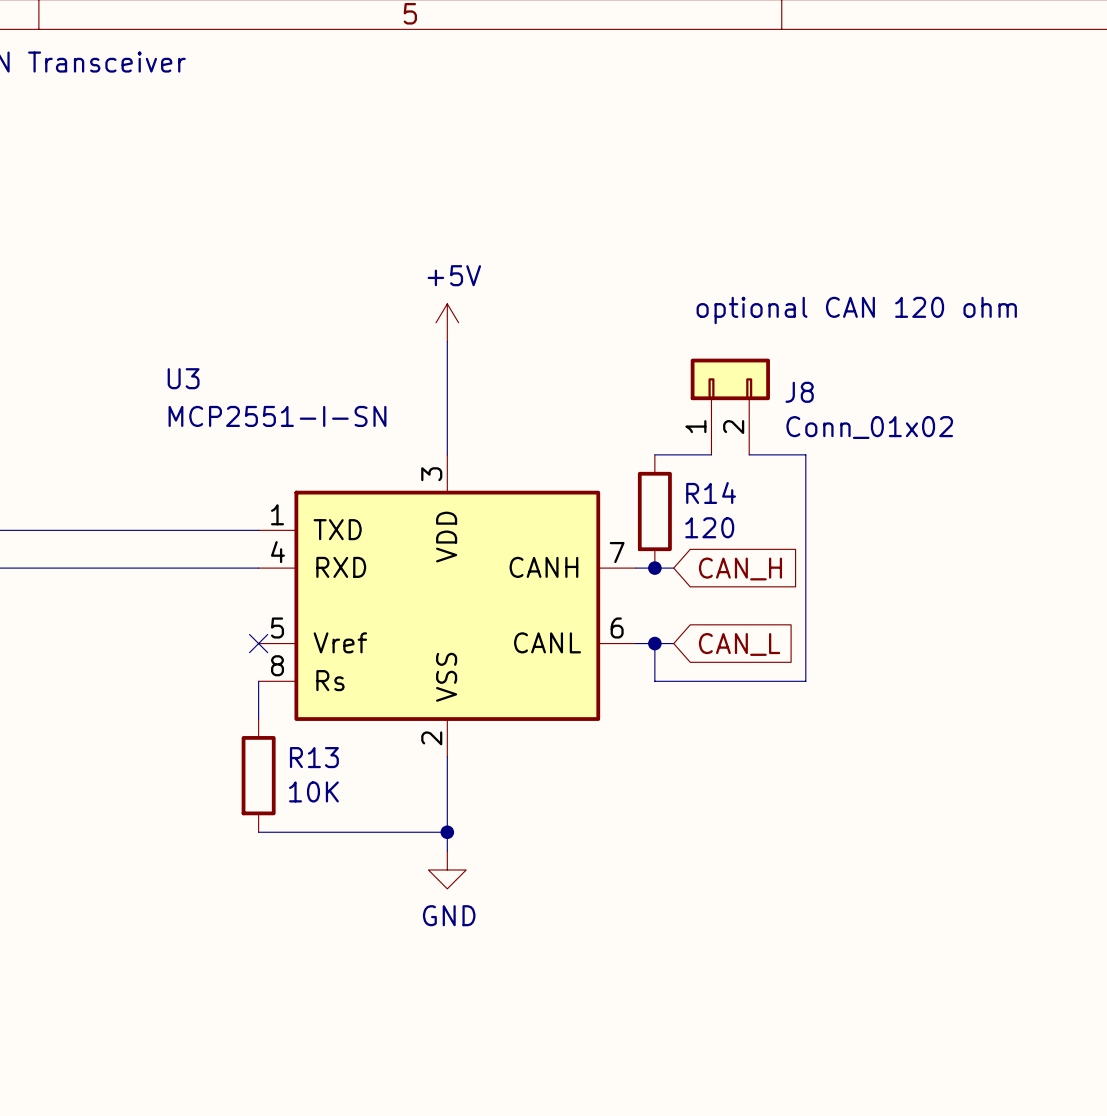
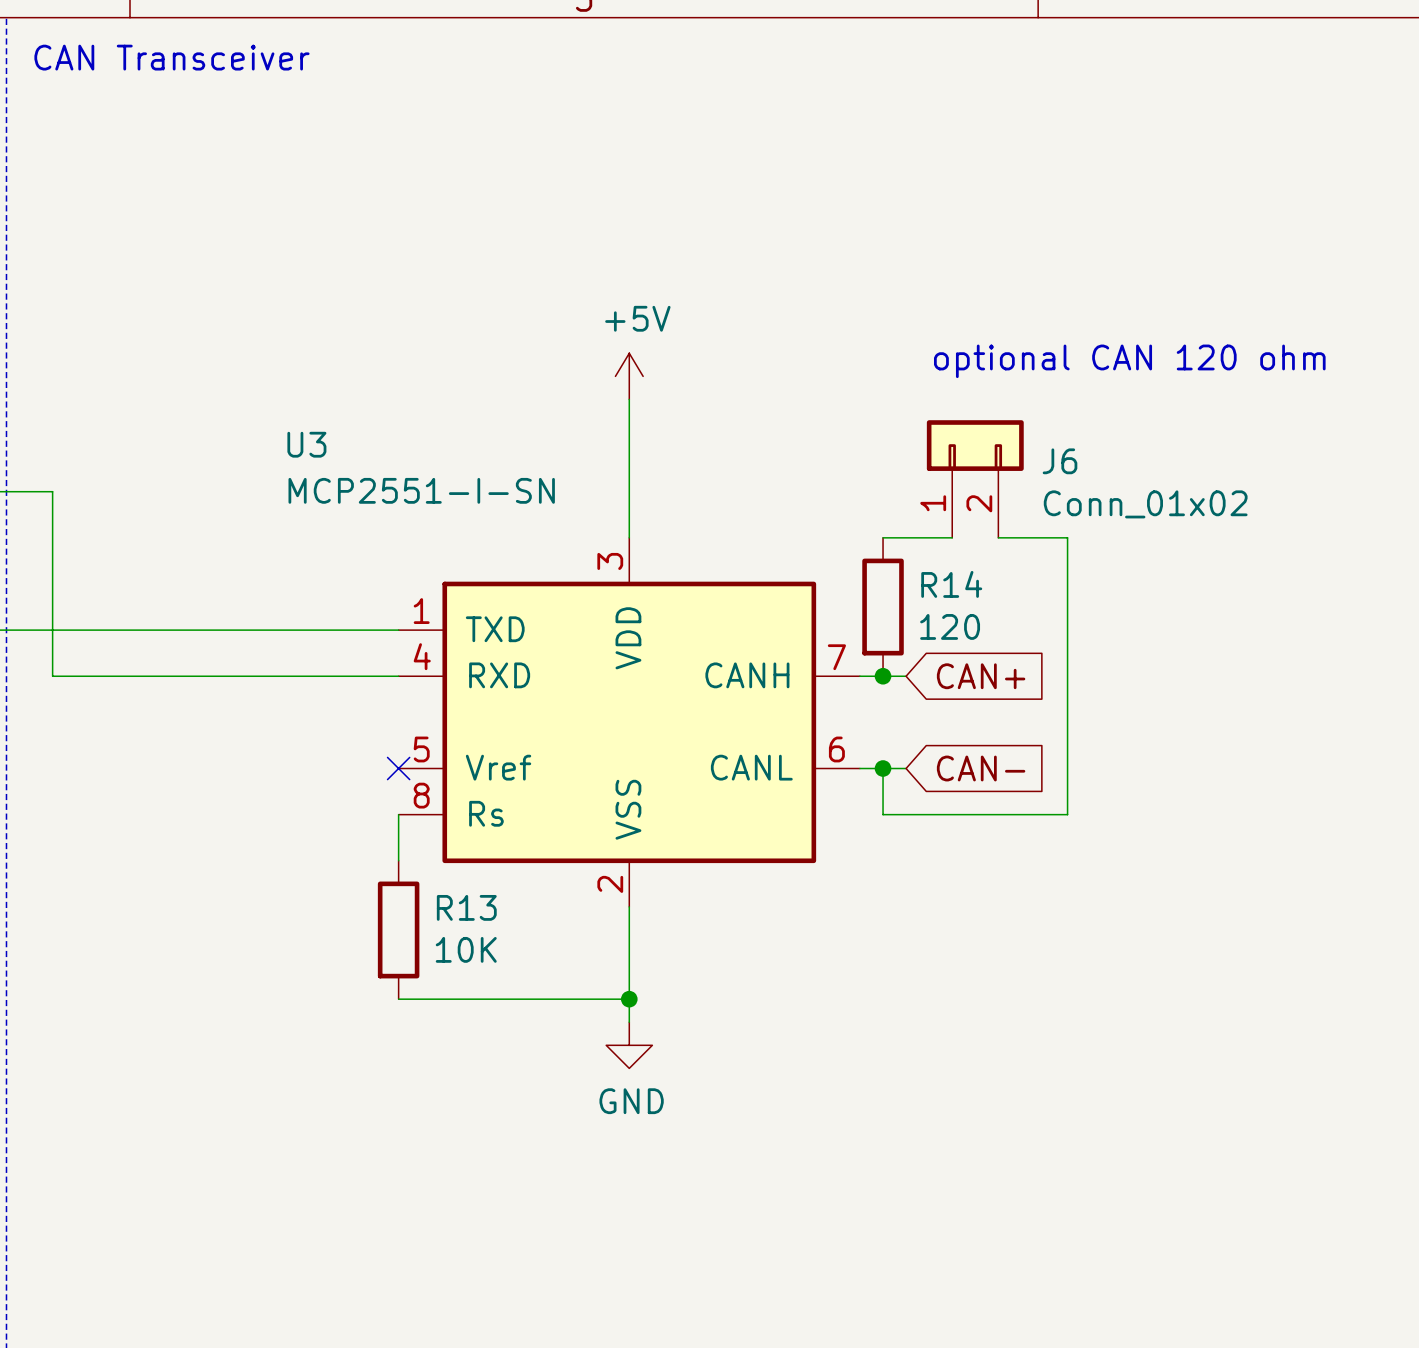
J8 name: J8 (799, 392) -> J6 (1060, 461)
global label: CAN_H (740, 568) -> CAN+ (981, 676)
global label: CAN_L (739, 644) -> CAN- (981, 768)

